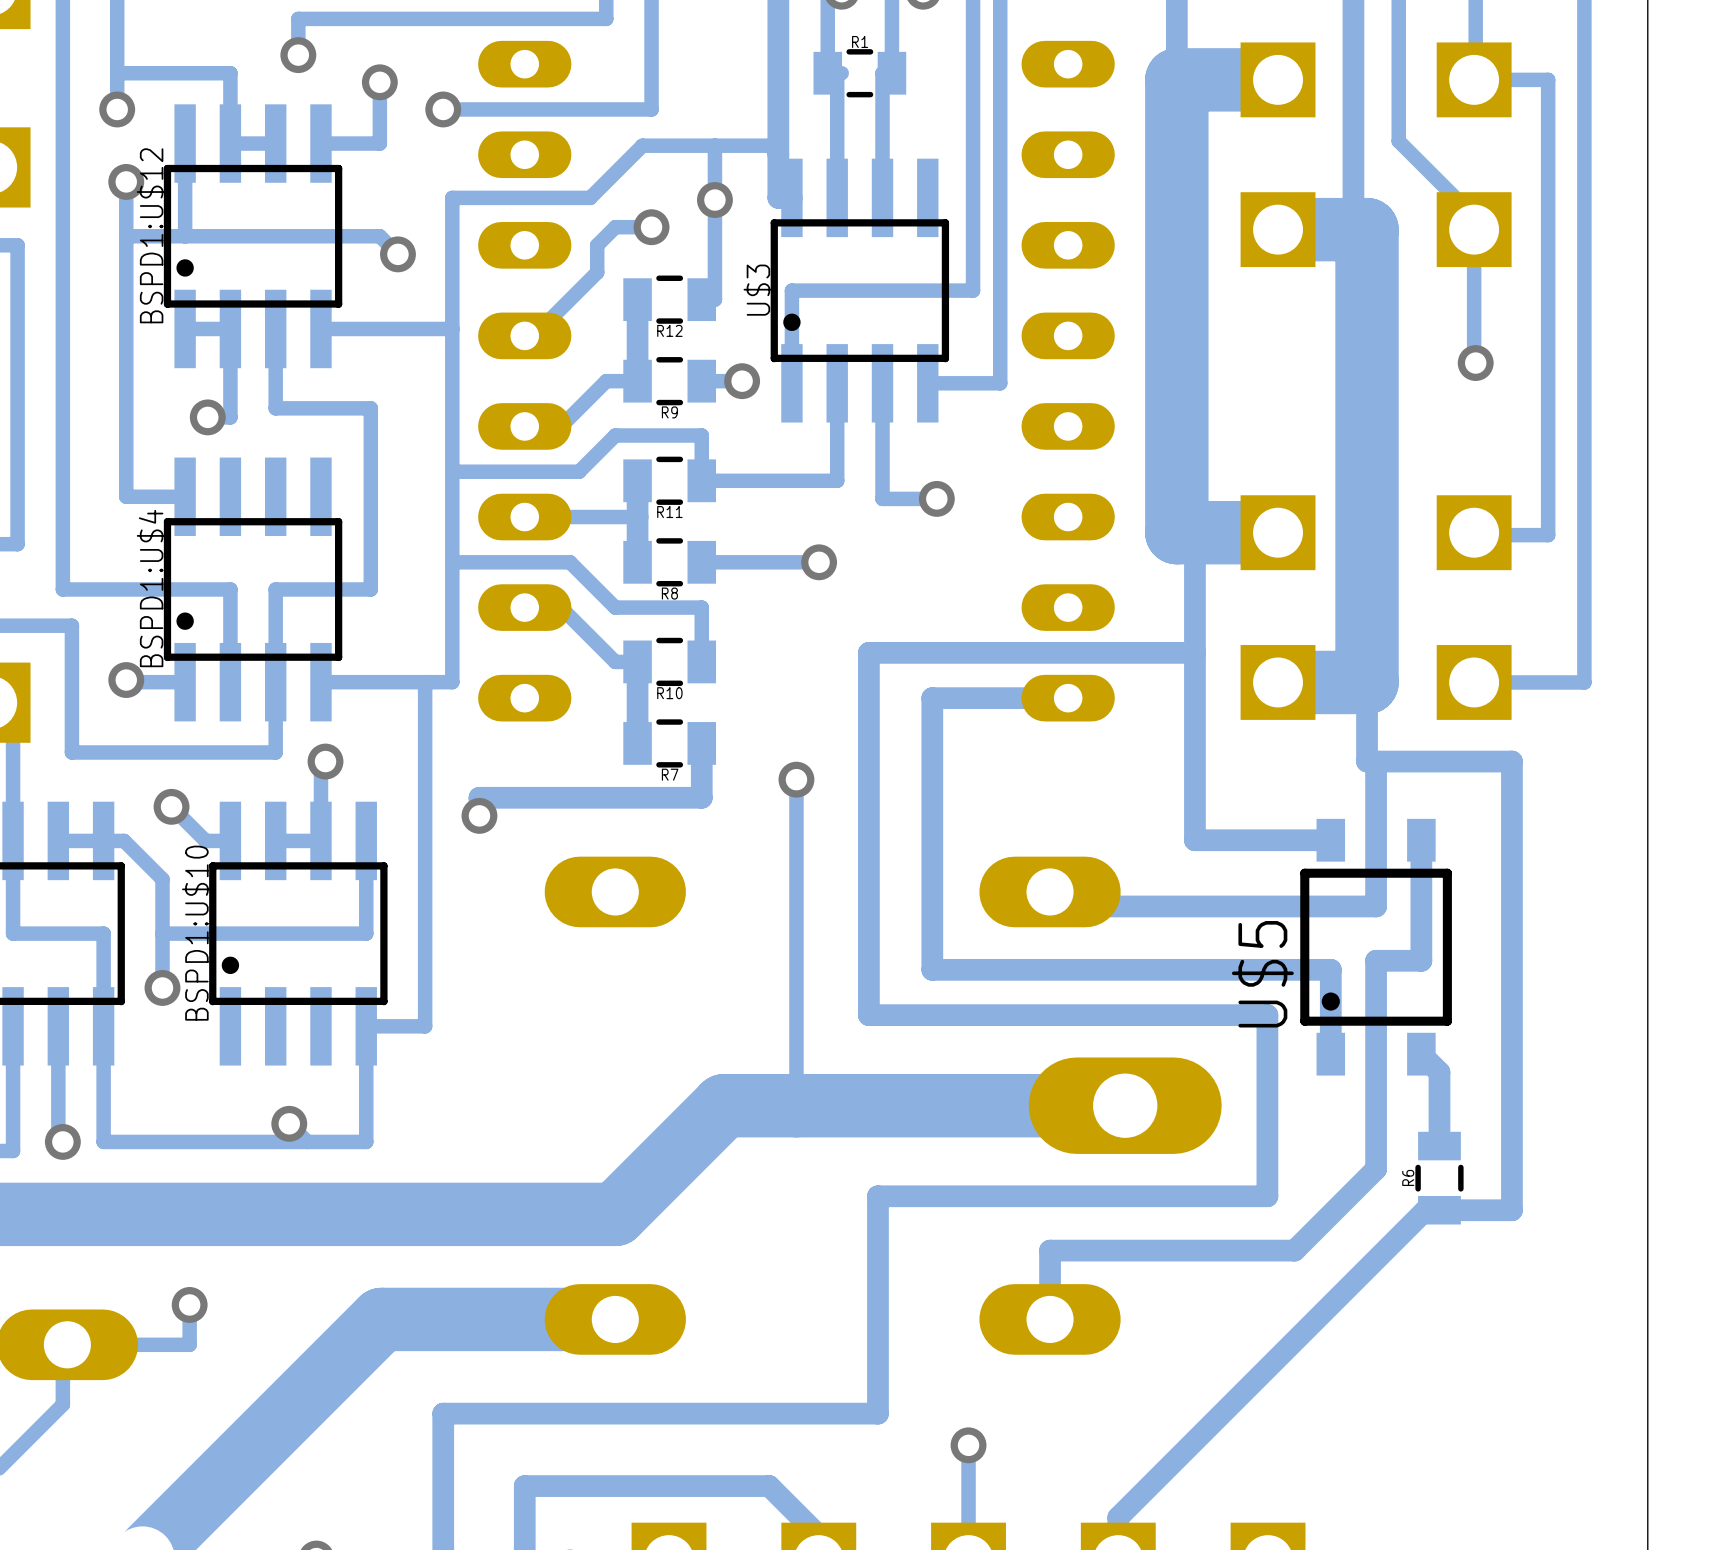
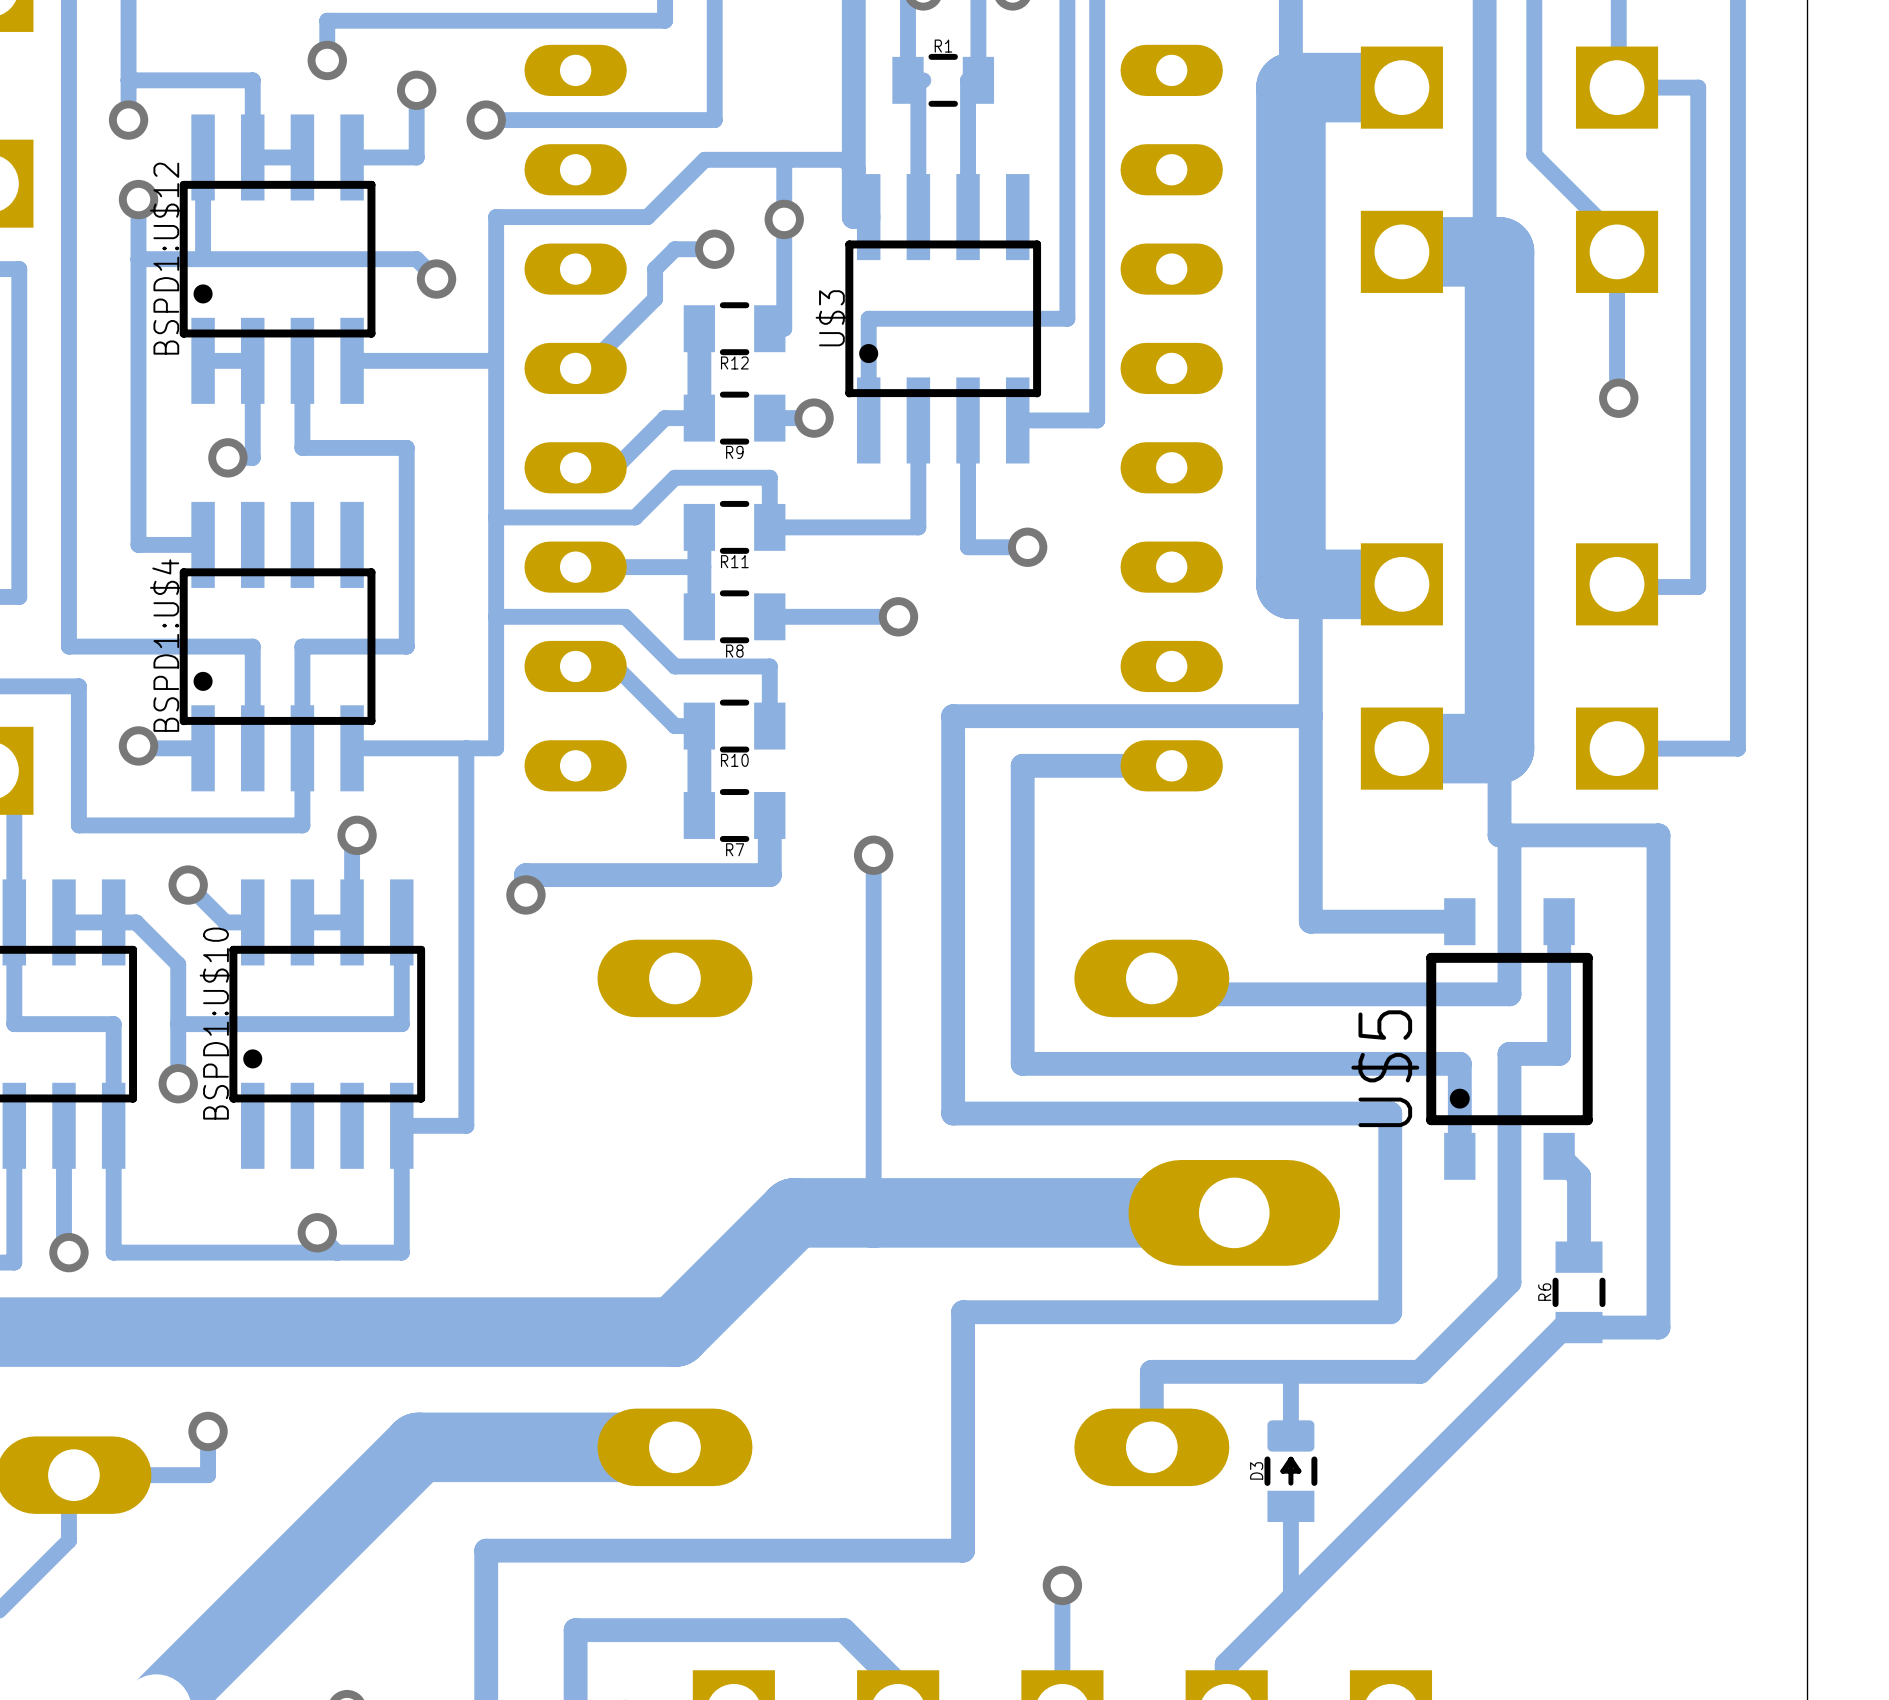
track: none -> (1290, 1371) (1290, 1435)
D3: none -> (1290, 1471)
track: none -> (1290, 1506) (1290, 1600)

